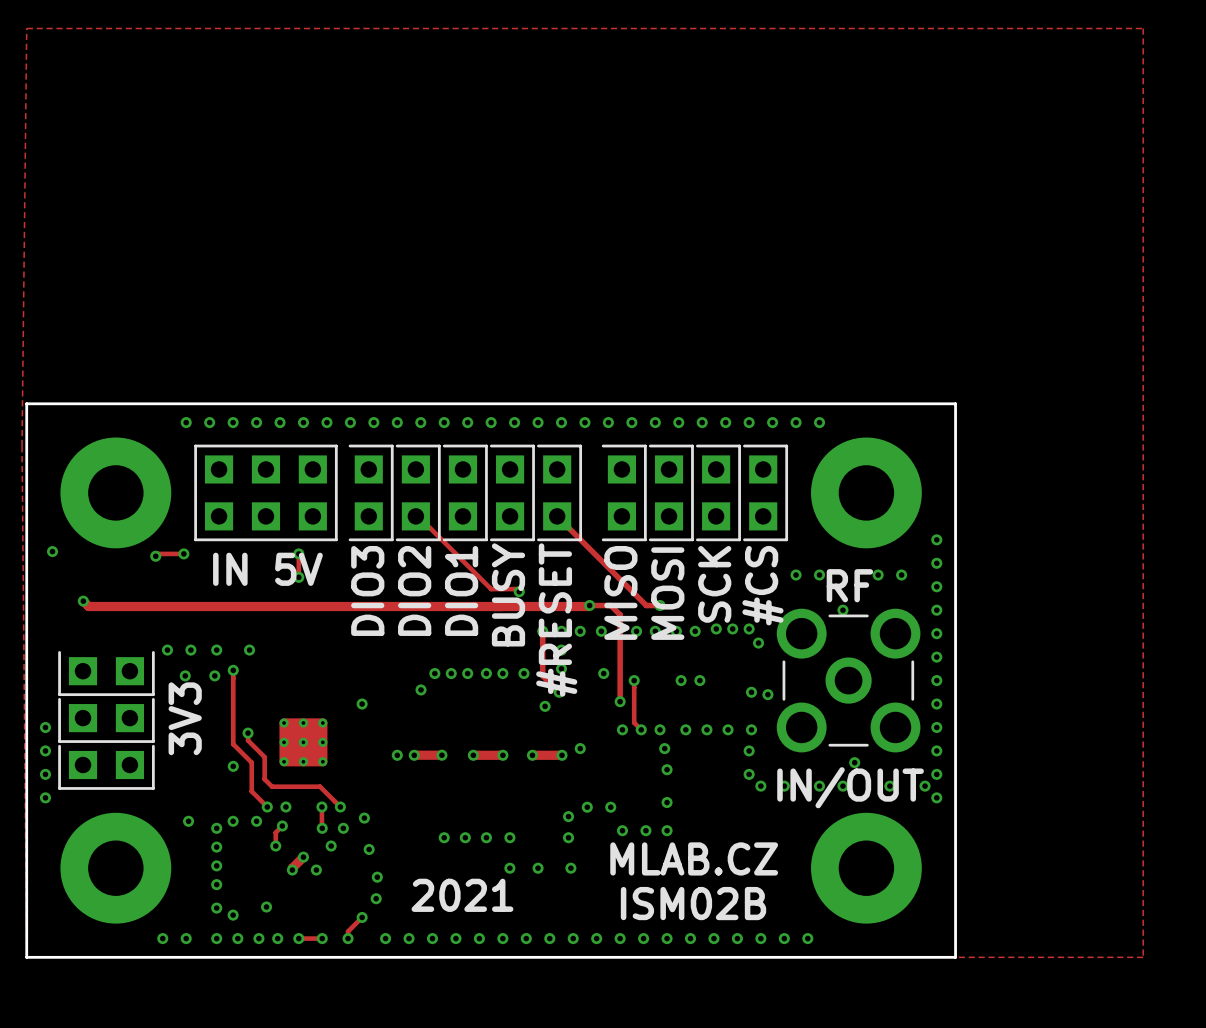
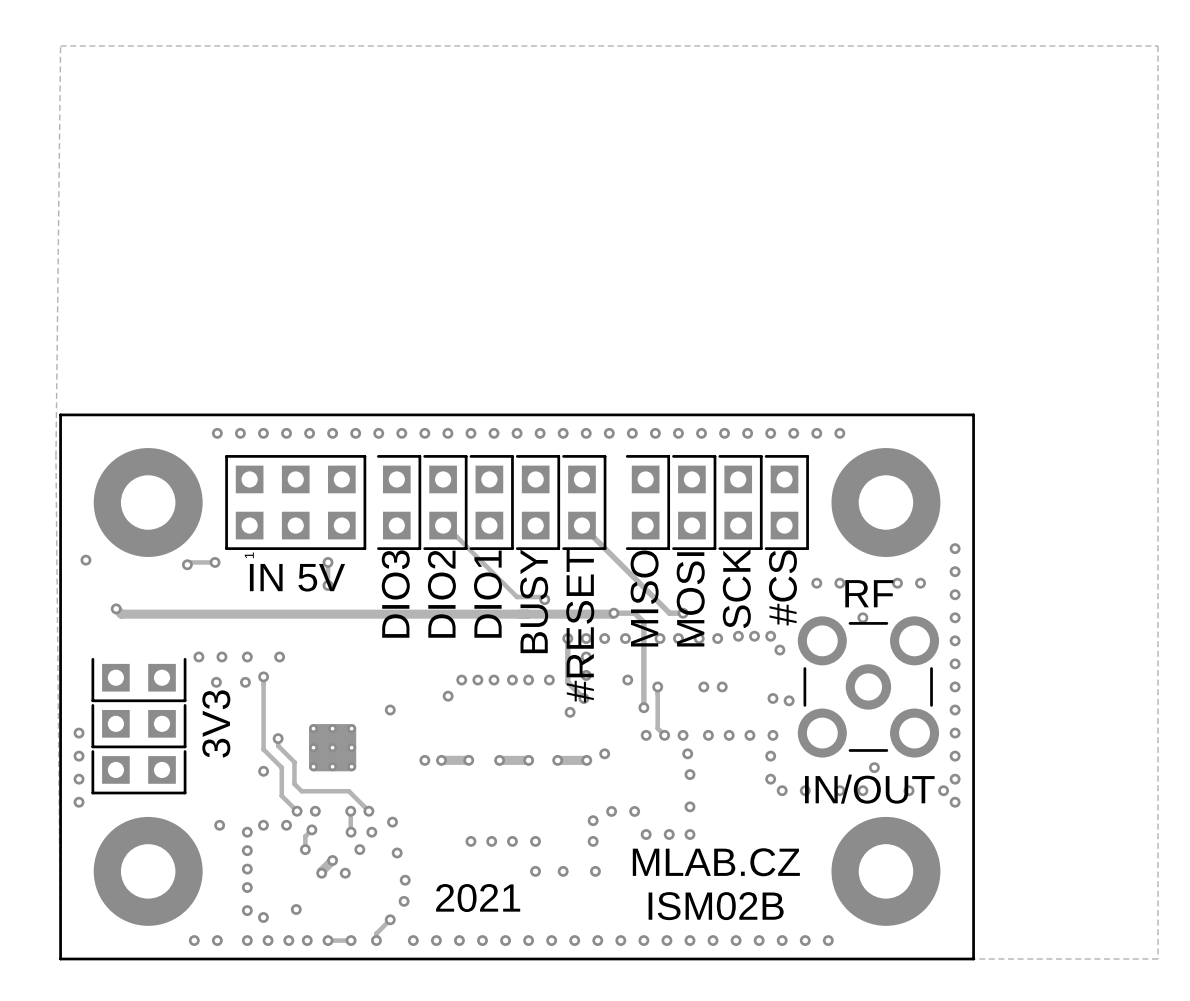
part text: none -> 1 (249, 555)

